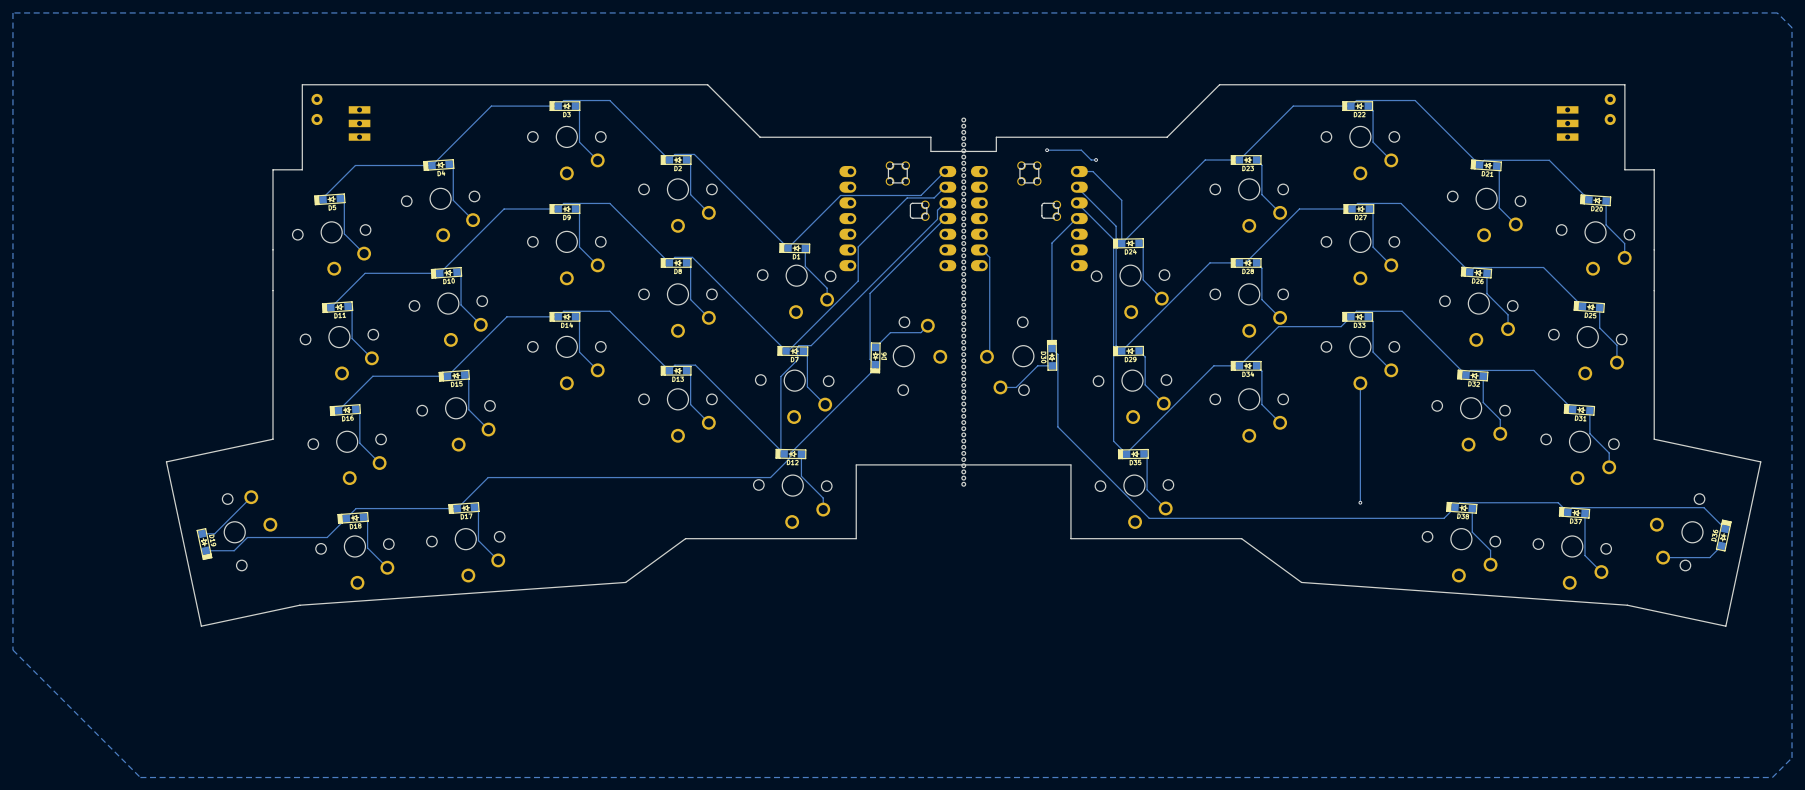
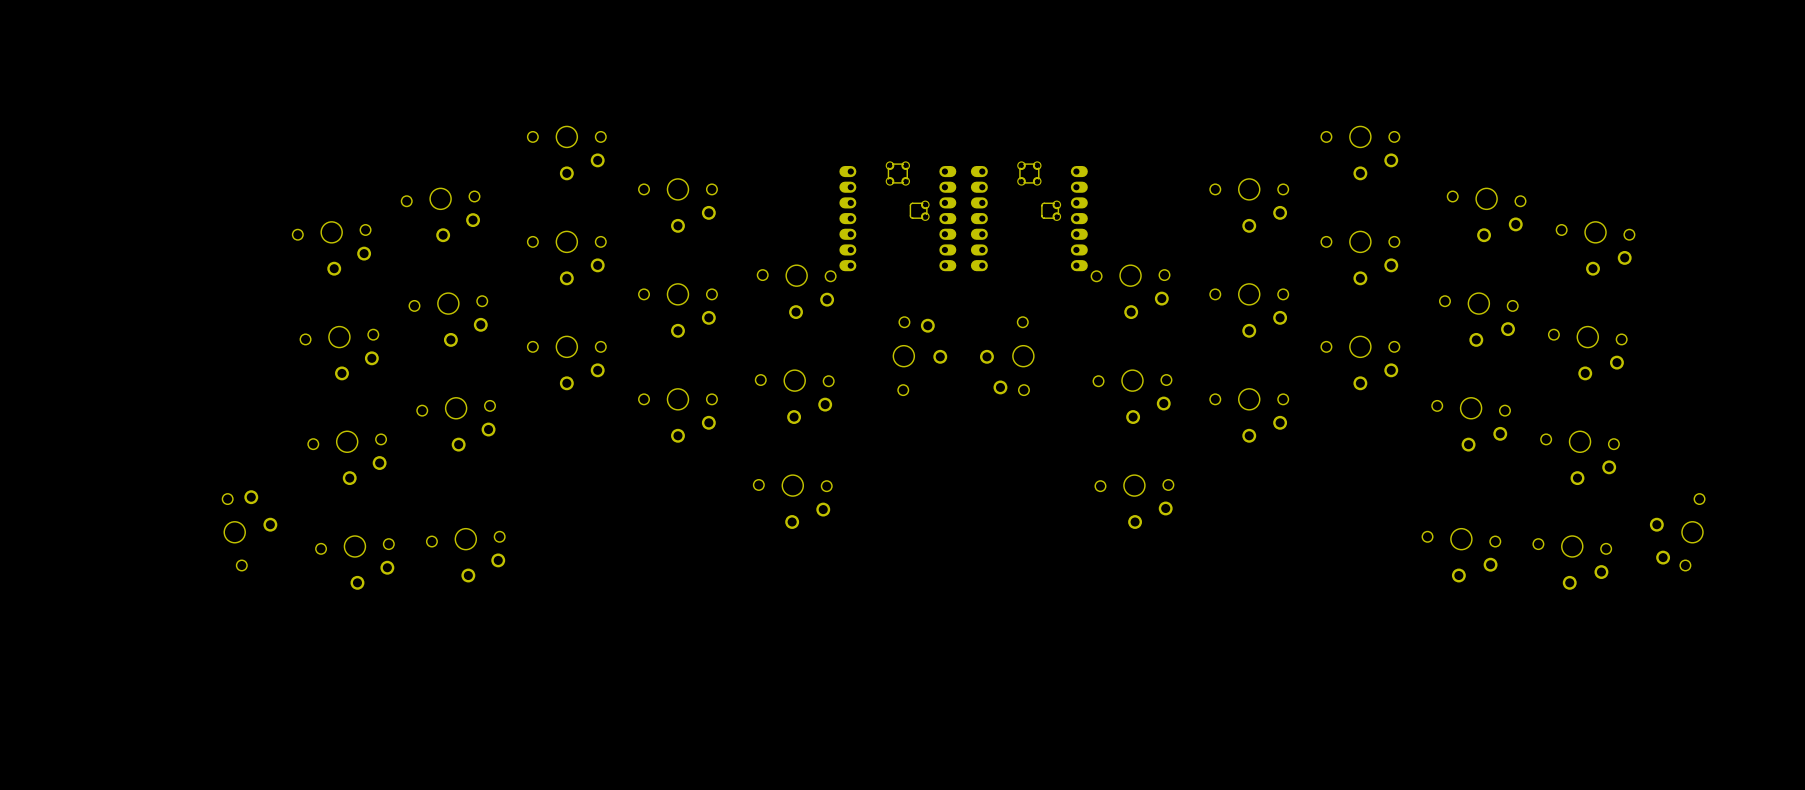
zone outline: (1777, 12) (1792, 27) (1792, 757) (1772, 777) (140, 777) (12, 650) (12, 12) (1777, 12) -> none
board edge: (1624, 84) (1219, 84) (1167, 137) (996, 137) (996, 151) (930, 151) (930, 137) (760, 137) (707, 84) (302, 84) (302, 169) (272, 169) (272, 439) (166, 461) (201, 626) (299, 605) (625, 582) (685, 538) (856, 538) (856, 464) (1070, 464) (1070, 538) (1241, 538) (1301, 582) (1627, 605) (1725, 626) (1760, 461) (1654, 439) (1654, 169) (1624, 169) (1624, 84) -> none
part: (316, 99) -> none
part: (1610, 99) -> none
part: (564, 106) -> none
track: (575, 106) (579, 110) (579, 142) (597, 160) -> none
part: (1357, 106) -> none
track: (1368, 106) (1373, 110) (1373, 142) (1391, 160) -> none
part: (316, 119) -> none
part: (1610, 119) -> none
part: (359, 123) -> none
part: (1567, 123) -> none
track: (1047, 150) (1081, 150) (1091, 160) (1096, 160) -> none
via: (1047, 150) -> none
part: (676, 160) -> none
track: (686, 160) (690, 164) (690, 194) (708, 212) -> none
via: (1096, 160) -> none
part: (1246, 160) -> none
track: (1256, 160) (1261, 165) (1261, 194) (1280, 212) -> none
track: (449, 164) (453, 168) (453, 200) (473, 220) -> none
part: (438, 165) -> none
part: (1486, 165) -> none
track: (1496, 166) (1499, 168) (1499, 207) (1515, 224) -> none
track: (944, 171) (920, 195) (840, 195) (788, 248) (694, 154) (674, 154) (669, 160) (609, 100) (563, 100) (558, 106) (491, 106) (431, 165) (355, 165) (323, 199) -> none
track: (1076, 171) (1092, 171) (1121, 200) (1121, 243) (1205, 160) (1239, 160) (1293, 106) (1350, 106) (1356, 100) (1415, 100) (1479, 164) (1484, 160) (1549, 160) (1588, 199) -> none
track: (944, 187) (934, 197) (907, 197) (858, 246) (858, 281) (788, 350) (786, 350) (692, 257) (674, 257) (669, 262) (609, 203) (563, 203) (558, 209) (504, 209) (439, 273) (365, 273) (330, 307) -> none
track: (1076, 187) (1116, 226) (1116, 345) (1121, 351) (1209, 262) (1245, 262) (1299, 209) (1352, 209) (1357, 203) (1401, 203) (1469, 272) (1474, 267) (1543, 267) (1582, 306) -> none
track: (340, 198) (344, 202) (344, 233) (364, 253) -> none
part: (329, 199) -> none
part: (1595, 200) -> none
track: (1606, 201) (1606, 225) (1624, 243) (1624, 257) -> none
track: (944, 202) (937, 210) (937, 219) (811, 345) (797, 346) (797, 359) (780, 376) (780, 450) -> none
track: (1076, 202) (1113, 239) (1113, 441) (1126, 454) (1213, 365) (1239, 365) (1278, 326) (1341, 326) (1356, 311) (1402, 311) (1465, 375) (1470, 370) (1533, 370) (1572, 409) -> none
part: (564, 209) -> none
track: (575, 209) (579, 213) (579, 247) (597, 265) -> none
part: (1358, 209) -> none
track: (1369, 209) (1373, 212) (1373, 247) (1391, 265) -> none
track: (944, 218) (870, 293) (870, 359) (875, 364) (875, 368) (789, 454) (789, 458) (770, 477) (488, 477) (457, 508) (356, 508) (327, 537) (247, 537) (234, 550) (205, 550) -> none
track: (1076, 218) (1051, 243) (1051, 348) (1057, 354) (1057, 426) (1149, 518) (1444, 518) (1459, 502) (1558, 502) (1567, 512) (1572, 507) (1703, 507) (1725, 528) -> none
part: (1128, 243) -> none
track: (1139, 243) (1143, 247) (1143, 279) (1161, 298) -> none
part: (794, 248) -> none
track: (805, 248) (805, 266) (827, 288) (827, 299) -> none
track: (982, 249) (989, 257) (989, 354) (986, 356) -> none
part: (676, 262) -> none
track: (686, 262) (690, 266) (690, 299) (708, 317) -> none
part: (1246, 262) -> none
track: (1256, 262) (1261, 268) (1261, 299) (1280, 317) -> none
part: (446, 272) -> none
track: (456, 272) (461, 276) (461, 305) (480, 324) -> none
part: (1476, 272) -> none
track: (1486, 273) (1486, 293) (1508, 314) (1508, 329) -> none
part: (963, 302) -> none
track: (348, 306) (352, 310) (352, 338) (371, 358) -> none
part: (1589, 306) -> none
part: (337, 307) -> none
track: (1599, 307) (1599, 327) (1616, 345) (1616, 362) -> none
part: (564, 316) -> none
track: (575, 316) (579, 320) (579, 352) (597, 370) -> none
part: (1357, 316) -> none
track: (1368, 316) (1373, 321) (1373, 352) (1391, 370) -> none
track: (927, 325) (920, 332) (890, 332) (875, 347) -> none
track: (1139, 350) (1145, 356) (1145, 384) (1163, 403) -> none
part: (792, 351) -> none
track: (803, 351) (807, 355) (807, 386) (825, 404) -> none
part: (1128, 351) -> none
part: (1052, 355) -> none
part: (875, 357) -> none
track: (1052, 365) (1037, 365) (1016, 387) (1000, 387) -> none
part: (1246, 365) -> none
track: (1256, 365) (1261, 371) (1261, 404) (1280, 422) -> none
part: (676, 370) -> none
track: (686, 370) (690, 374) (690, 404) (708, 422) -> none
part: (454, 375) -> none
track: (464, 375) (468, 379) (468, 409) (488, 429) -> none
part: (1472, 375) -> none
track: (1483, 376) (1483, 402) (1500, 419) (1500, 433) -> none
track: (1360, 383) (1360, 502) -> none
track: (355, 409) (359, 413) (359, 443) (379, 463) -> none
part: (1579, 409) -> none
track: (338, 410) (372, 376) (447, 376) (506, 316) (558, 316) (563, 311) (609, 311) (669, 370) (674, 365) (695, 365) (784, 453) -> none
part: (345, 410) -> none
track: (1589, 410) (1589, 433) (1609, 453) (1609, 467) -> none
track: (1143, 453) (1147, 457) (1147, 489) (1165, 508) -> none
part: (790, 454) -> none
track: (801, 454) (801, 476) (823, 498) (823, 509) -> none
part: (1133, 454) -> none
track: (251, 497) (214, 533) (202, 533) -> none
via: (1360, 502) -> none
track: (474, 507) (478, 511) (478, 540) (498, 560) -> none
part: (1461, 507) -> none
part: (463, 508) -> none
track: (1472, 508) (1472, 532) (1490, 550) (1490, 564) -> none
part: (1574, 512) -> none
track: (1584, 513) (1584, 555) (1601, 572) -> none
part: (353, 517) -> none
track: (363, 517) (367, 521) (367, 547) (387, 567) -> none
part: (1723, 535) -> none
part: (204, 544) -> none
track: (1721, 545) (1709, 557) (1663, 557) -> none

